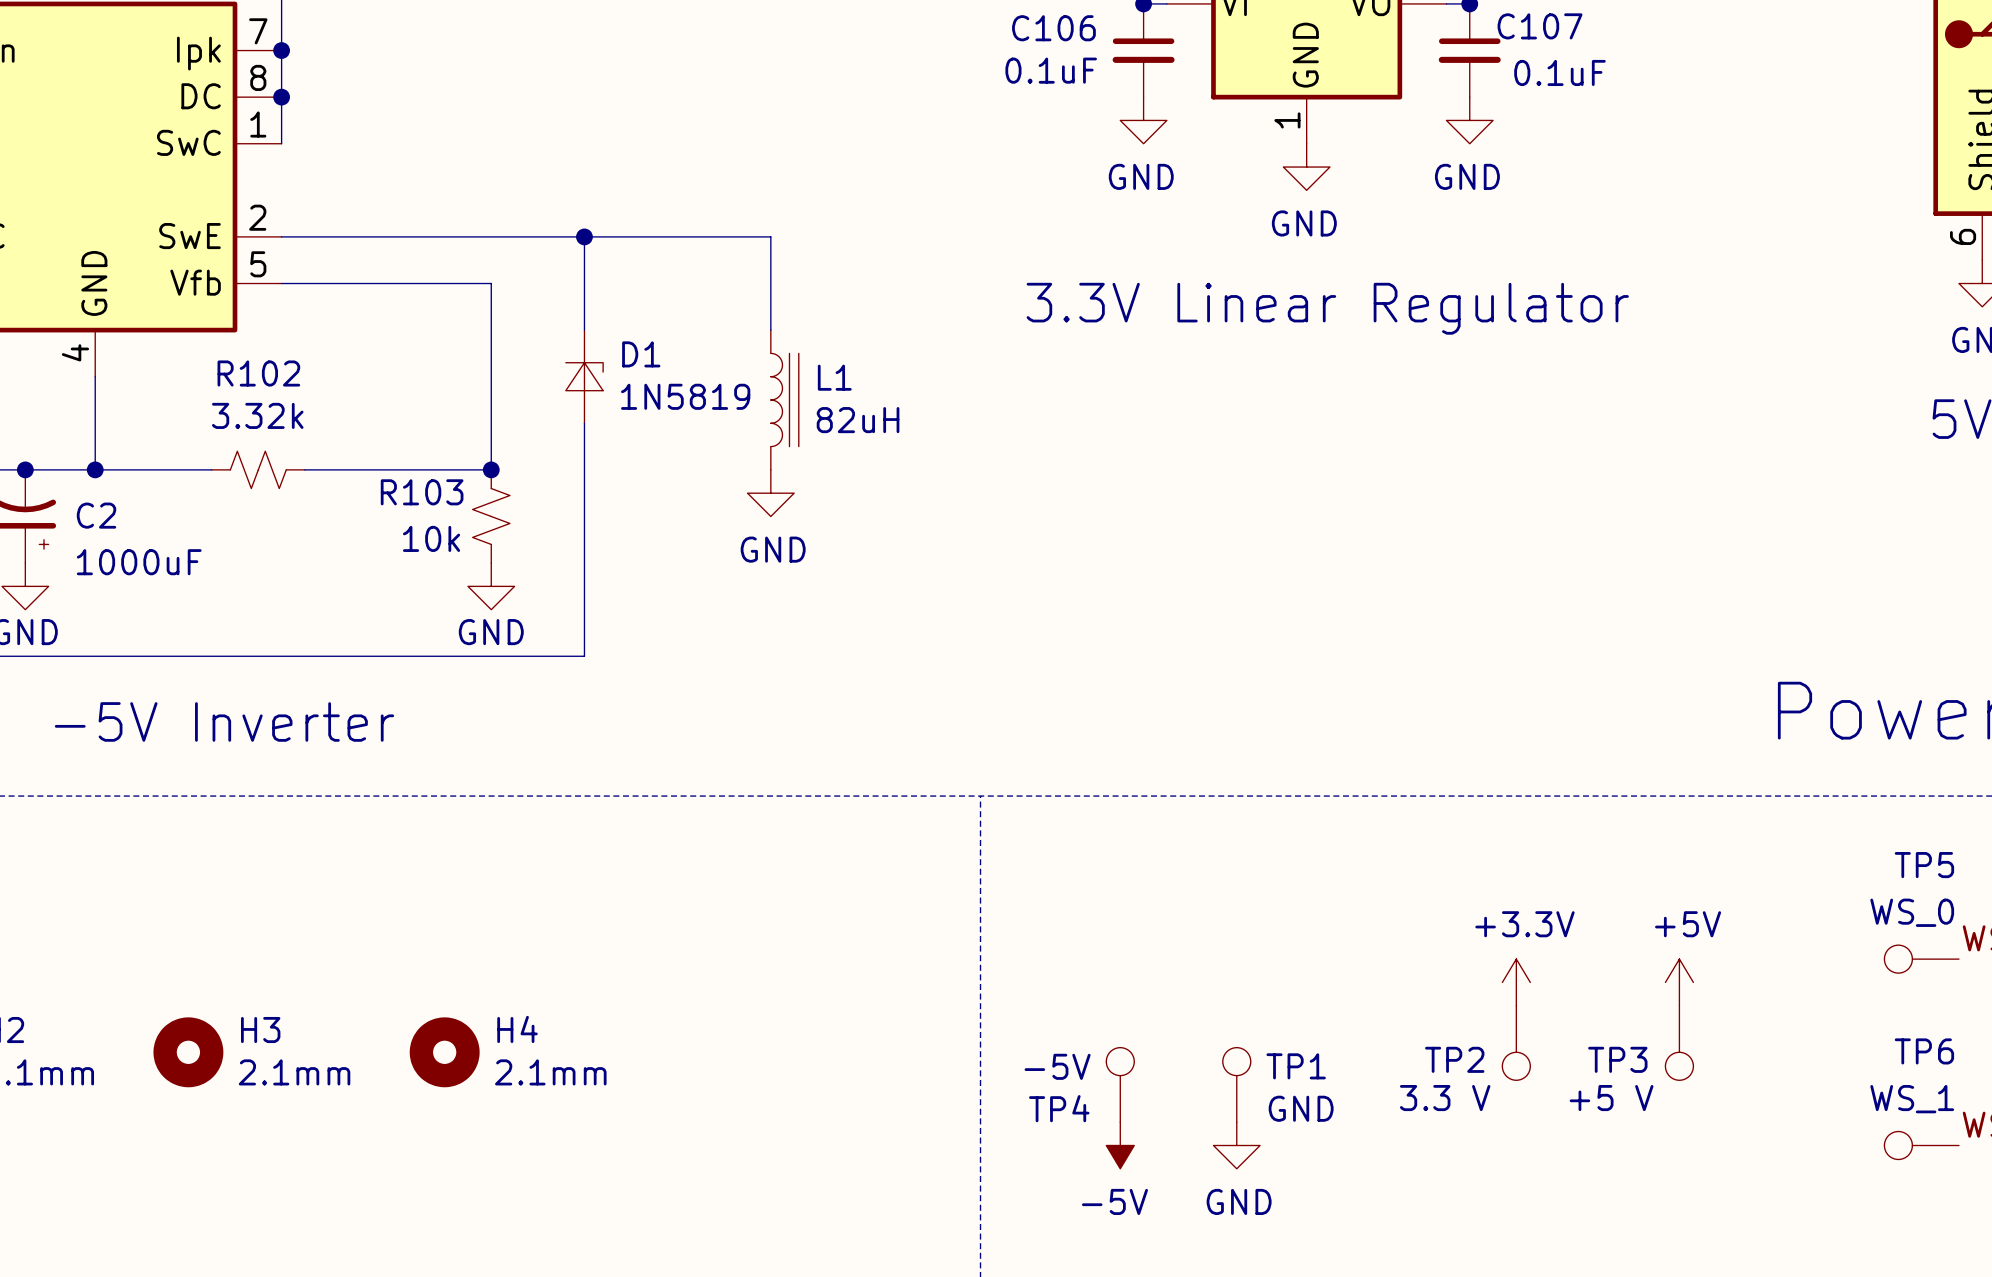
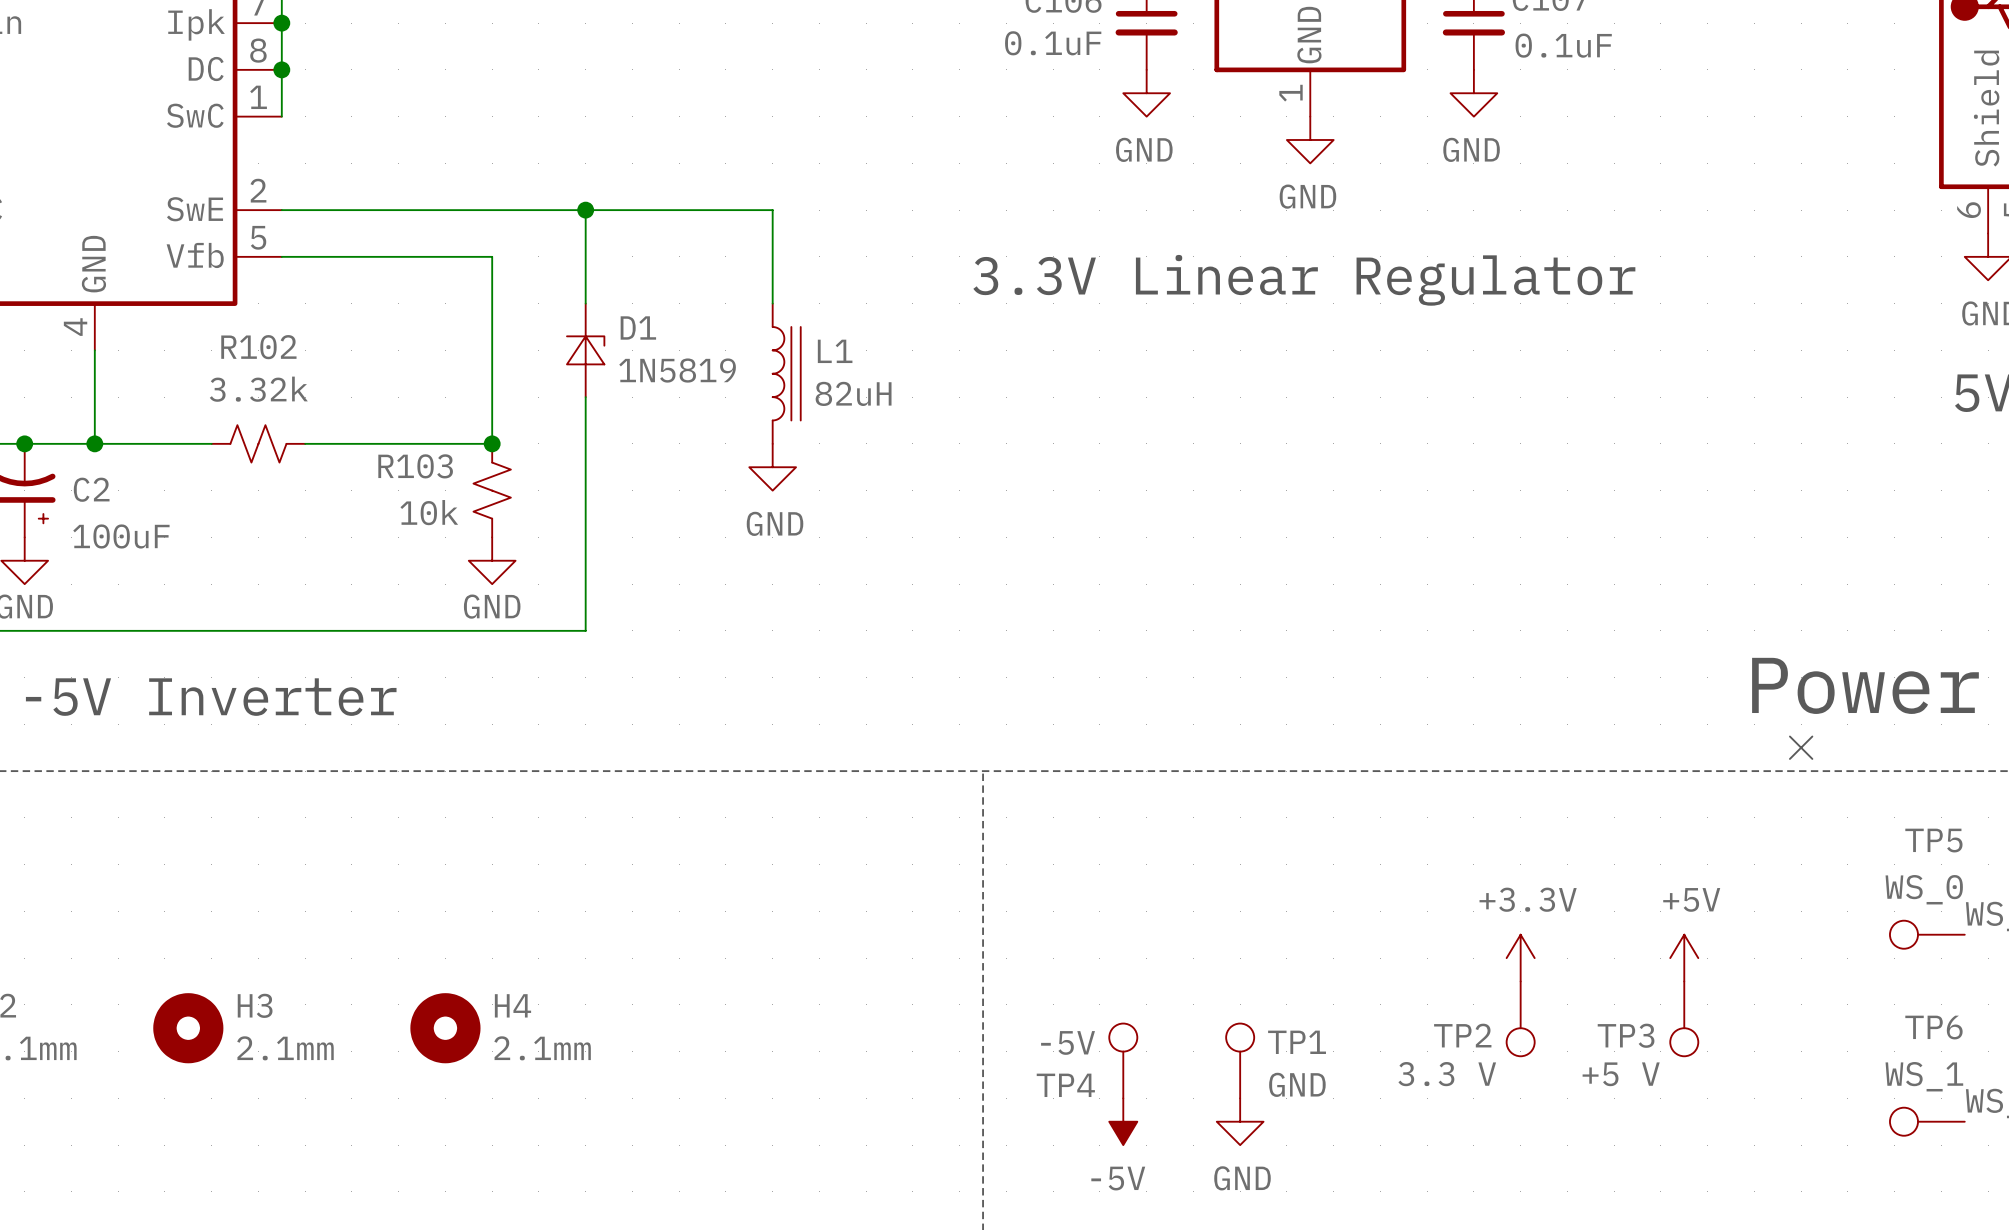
C2 value: 1000uF (139, 562) -> 100uF (121, 536)
no-connect mark: none -> (1801, 747)

